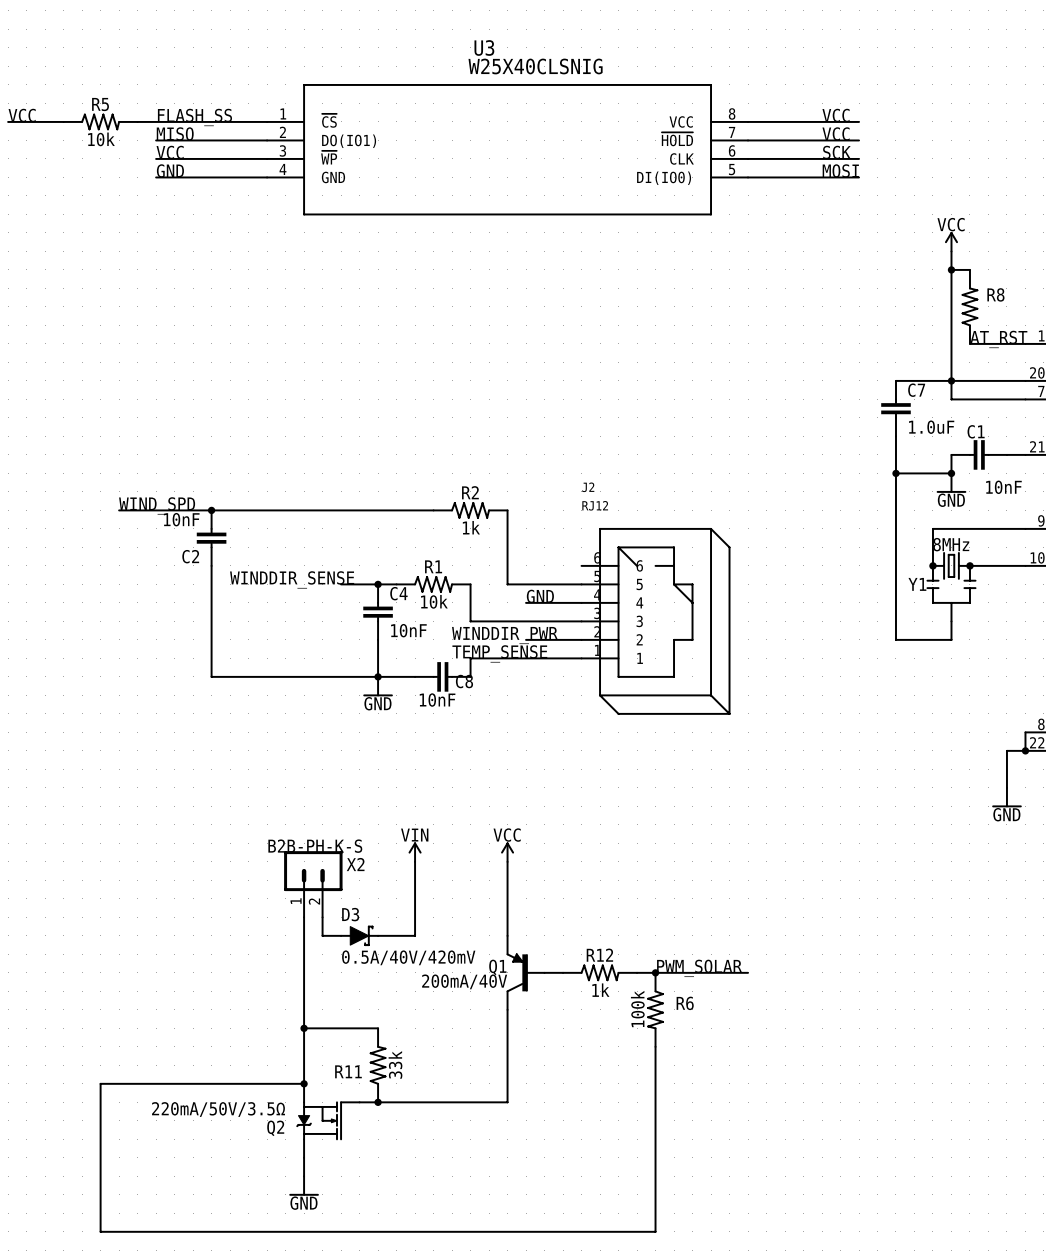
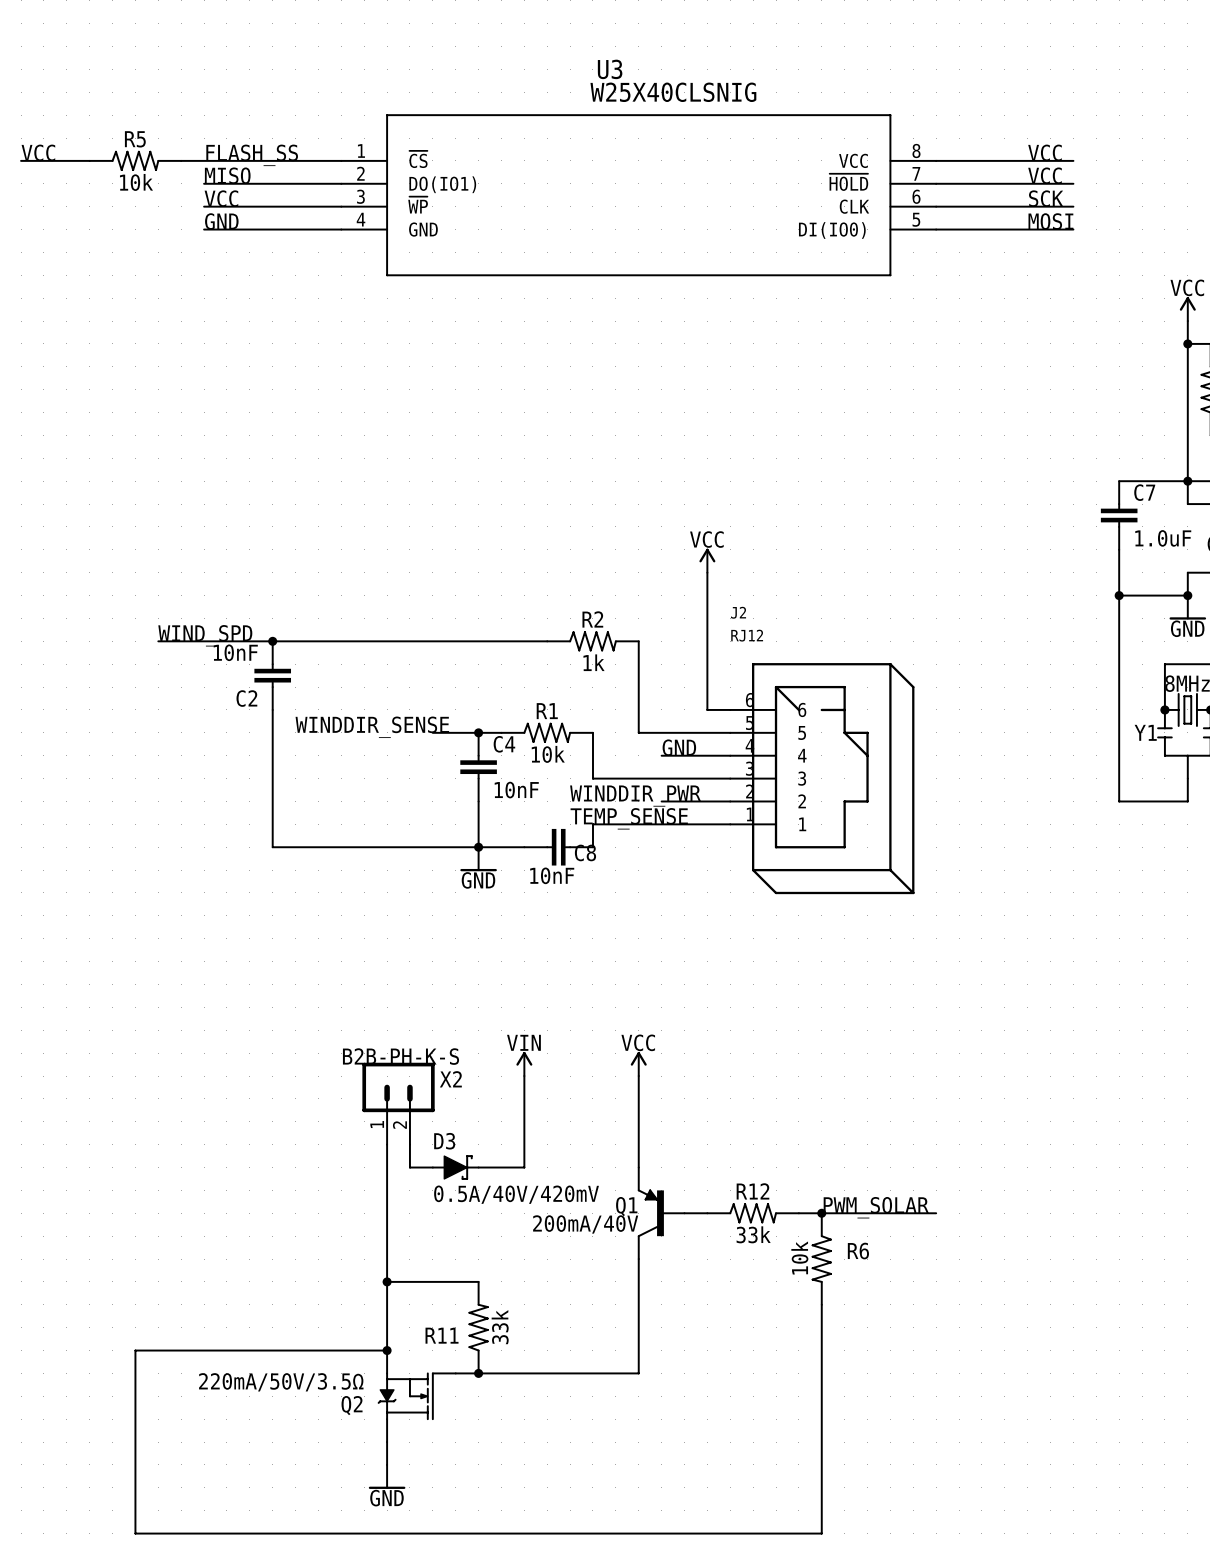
power symbol: none -> VCC (707, 560)
wire: none -> (707, 572) (707, 709) (730, 709)
R12 value: 1k (600, 990) -> 33k (753, 1234)
R6 value: 100k (637, 1009) -> 10k (799, 1257)

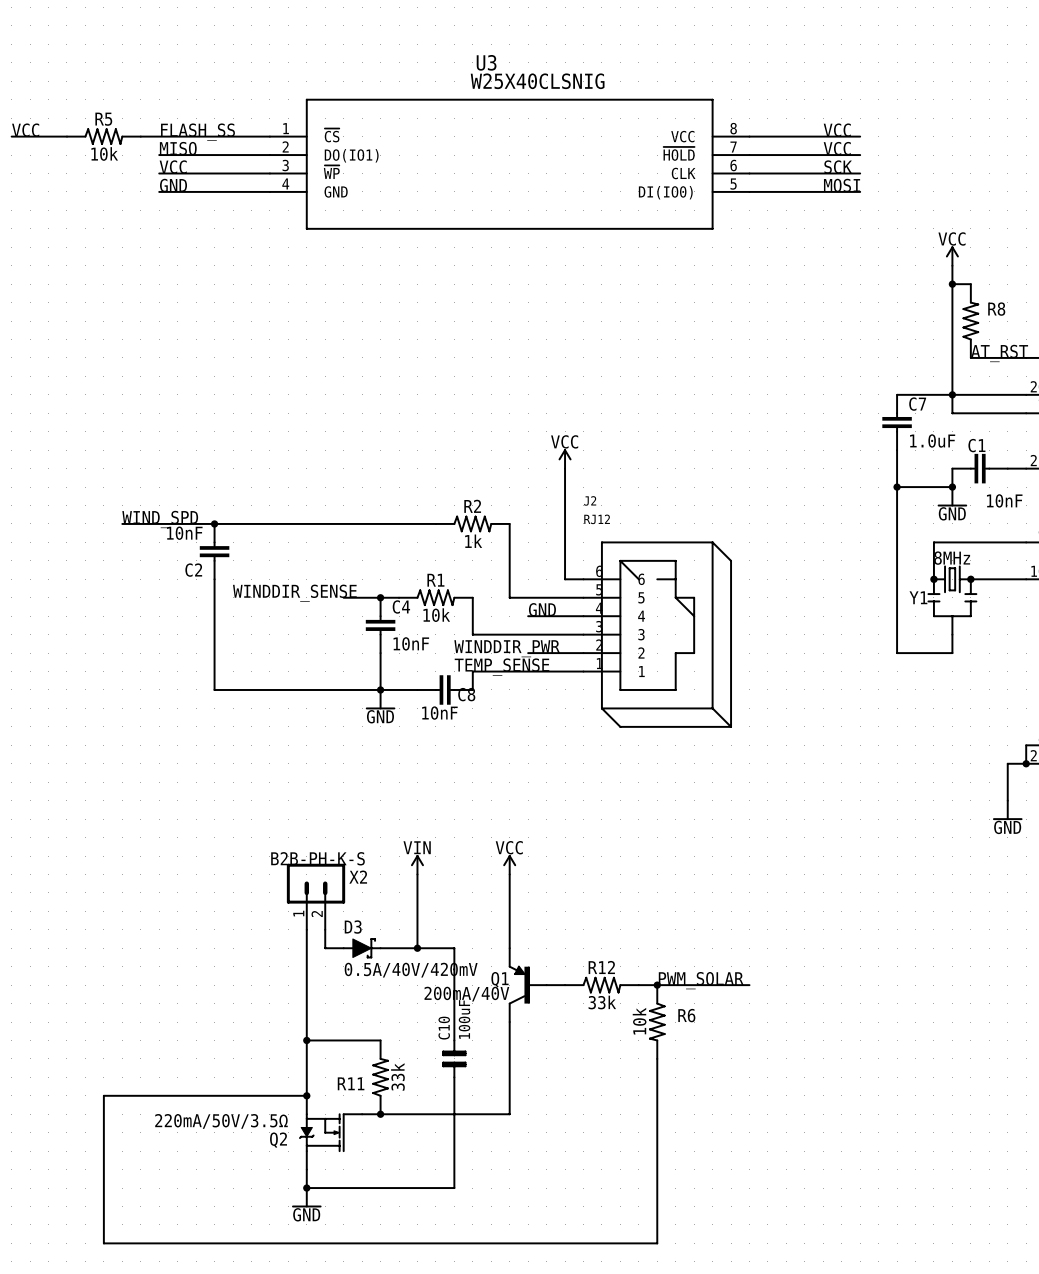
wire: none -> (417, 948) (454, 948) (454, 1040)
junction: none -> (417, 948)
C10: none -> 100uF (454, 1058)
wire: none -> (454, 1077) (454, 1188) (306, 1188)
junction: none -> (306, 1188)

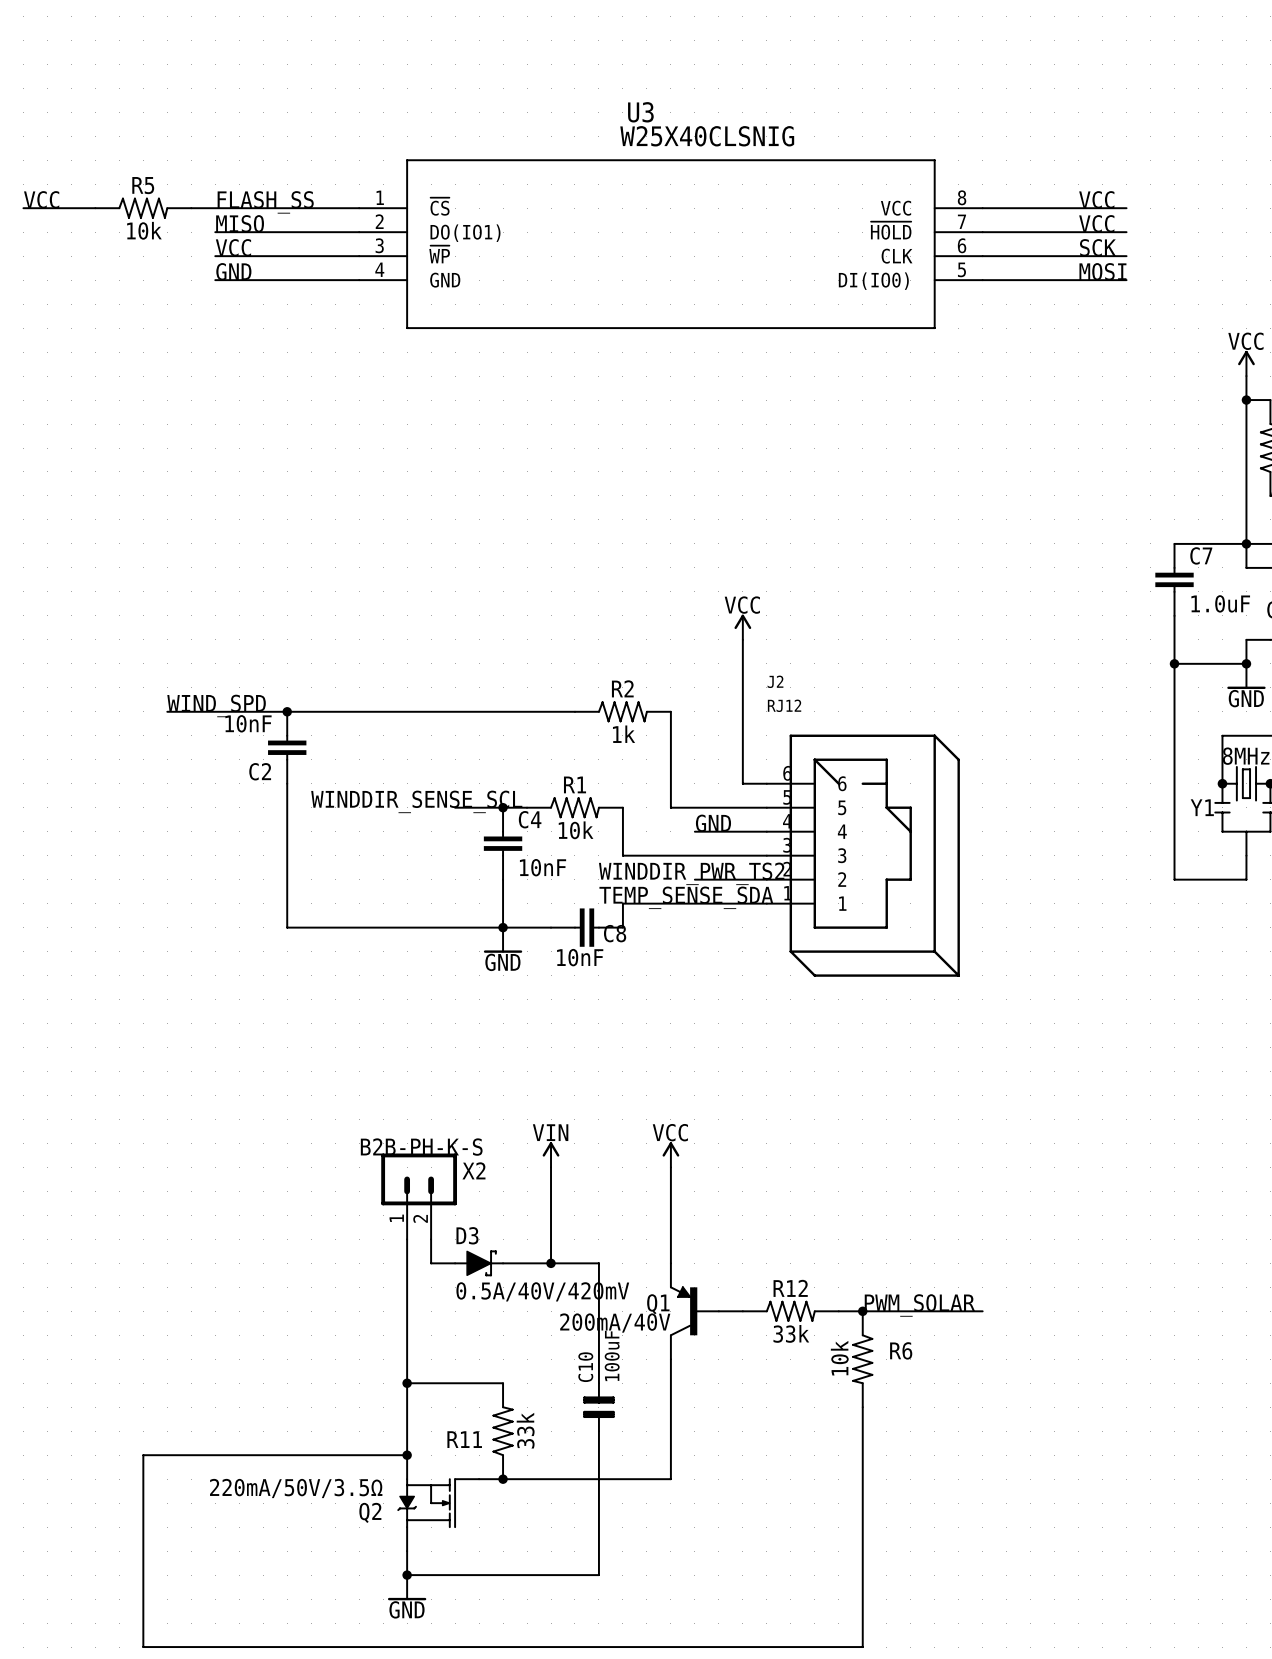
label: WINDDIR_SENSE (294, 593) -> WINDDIR_SENSE_SCL (416, 801)
label: WINDDIR_PWR (507, 648) -> WINDDIR_PWR_TS2 (691, 873)
label: TEMP_SENSE (502, 667) -> TEMP_SENSE_SDA (686, 897)

